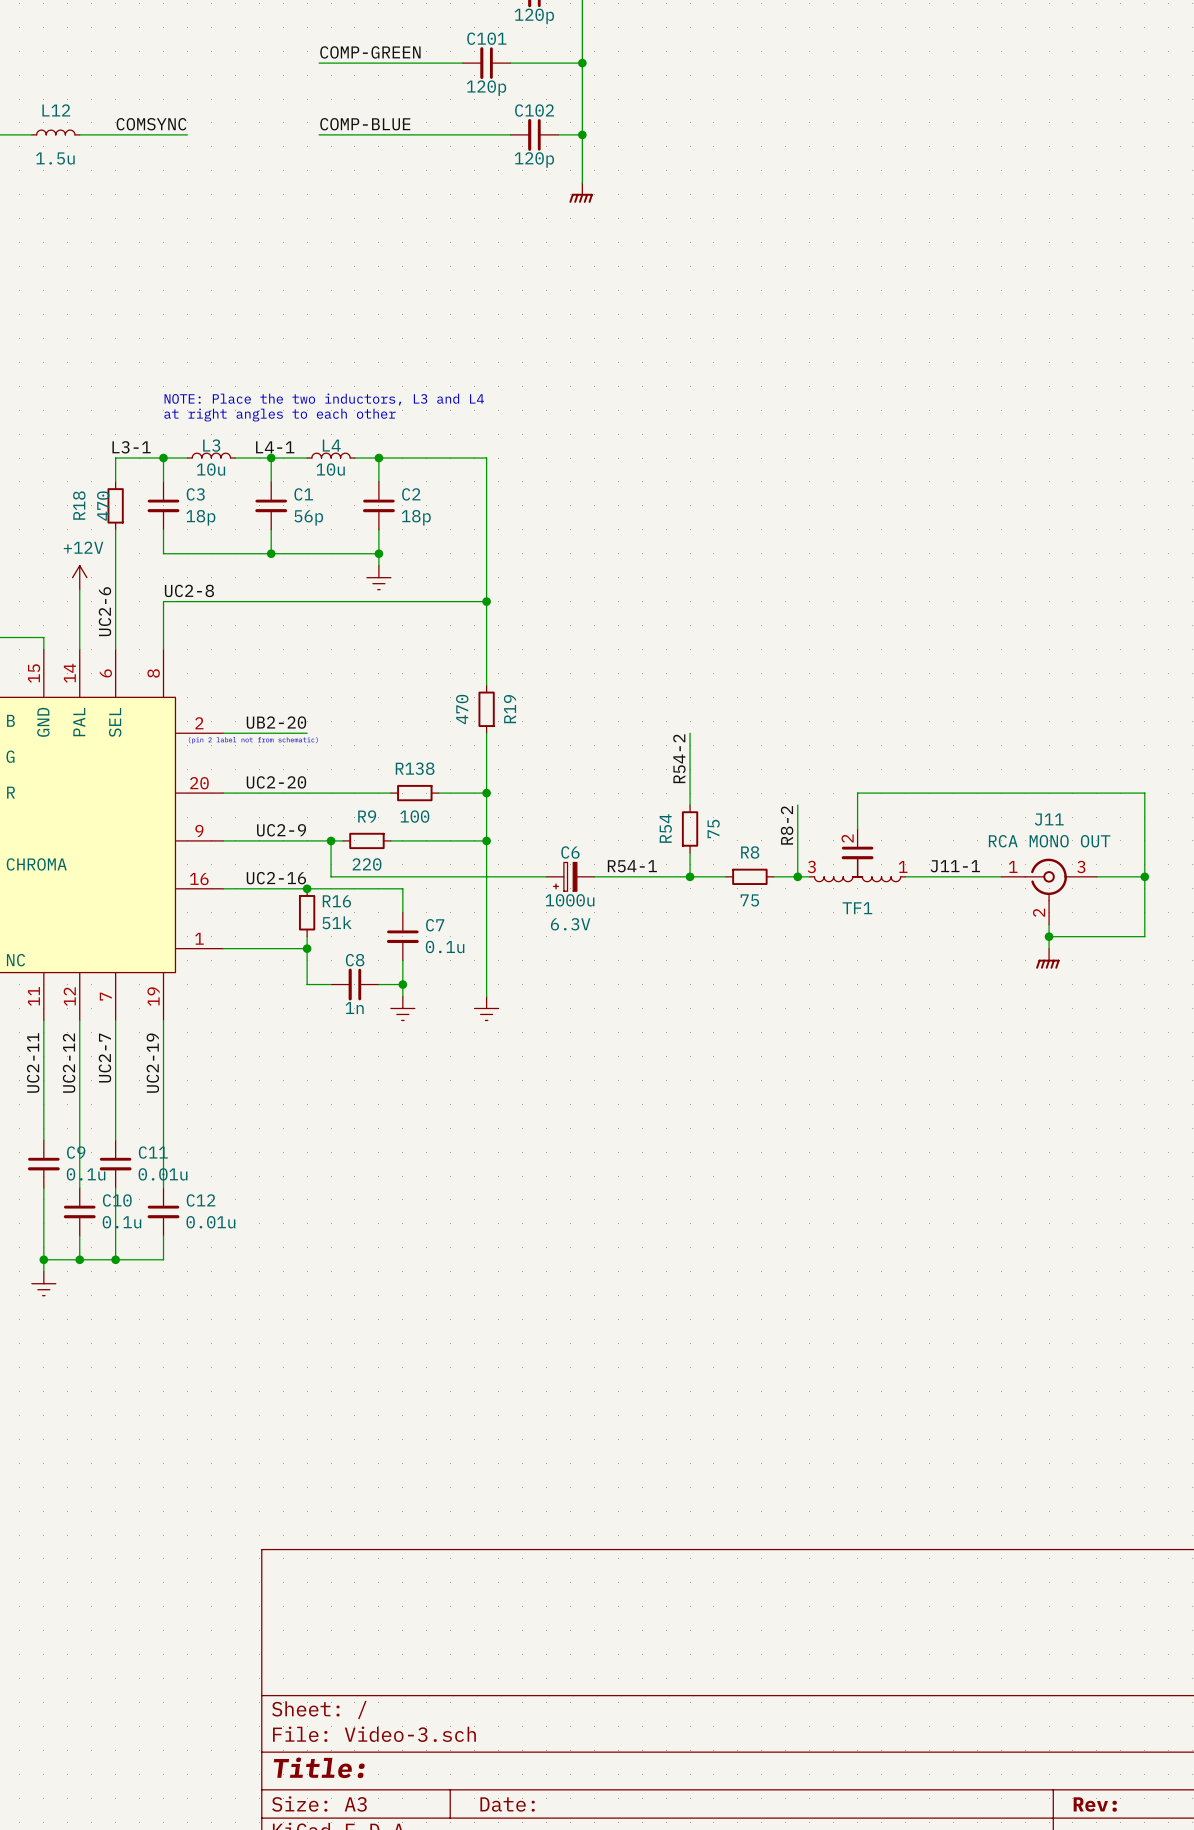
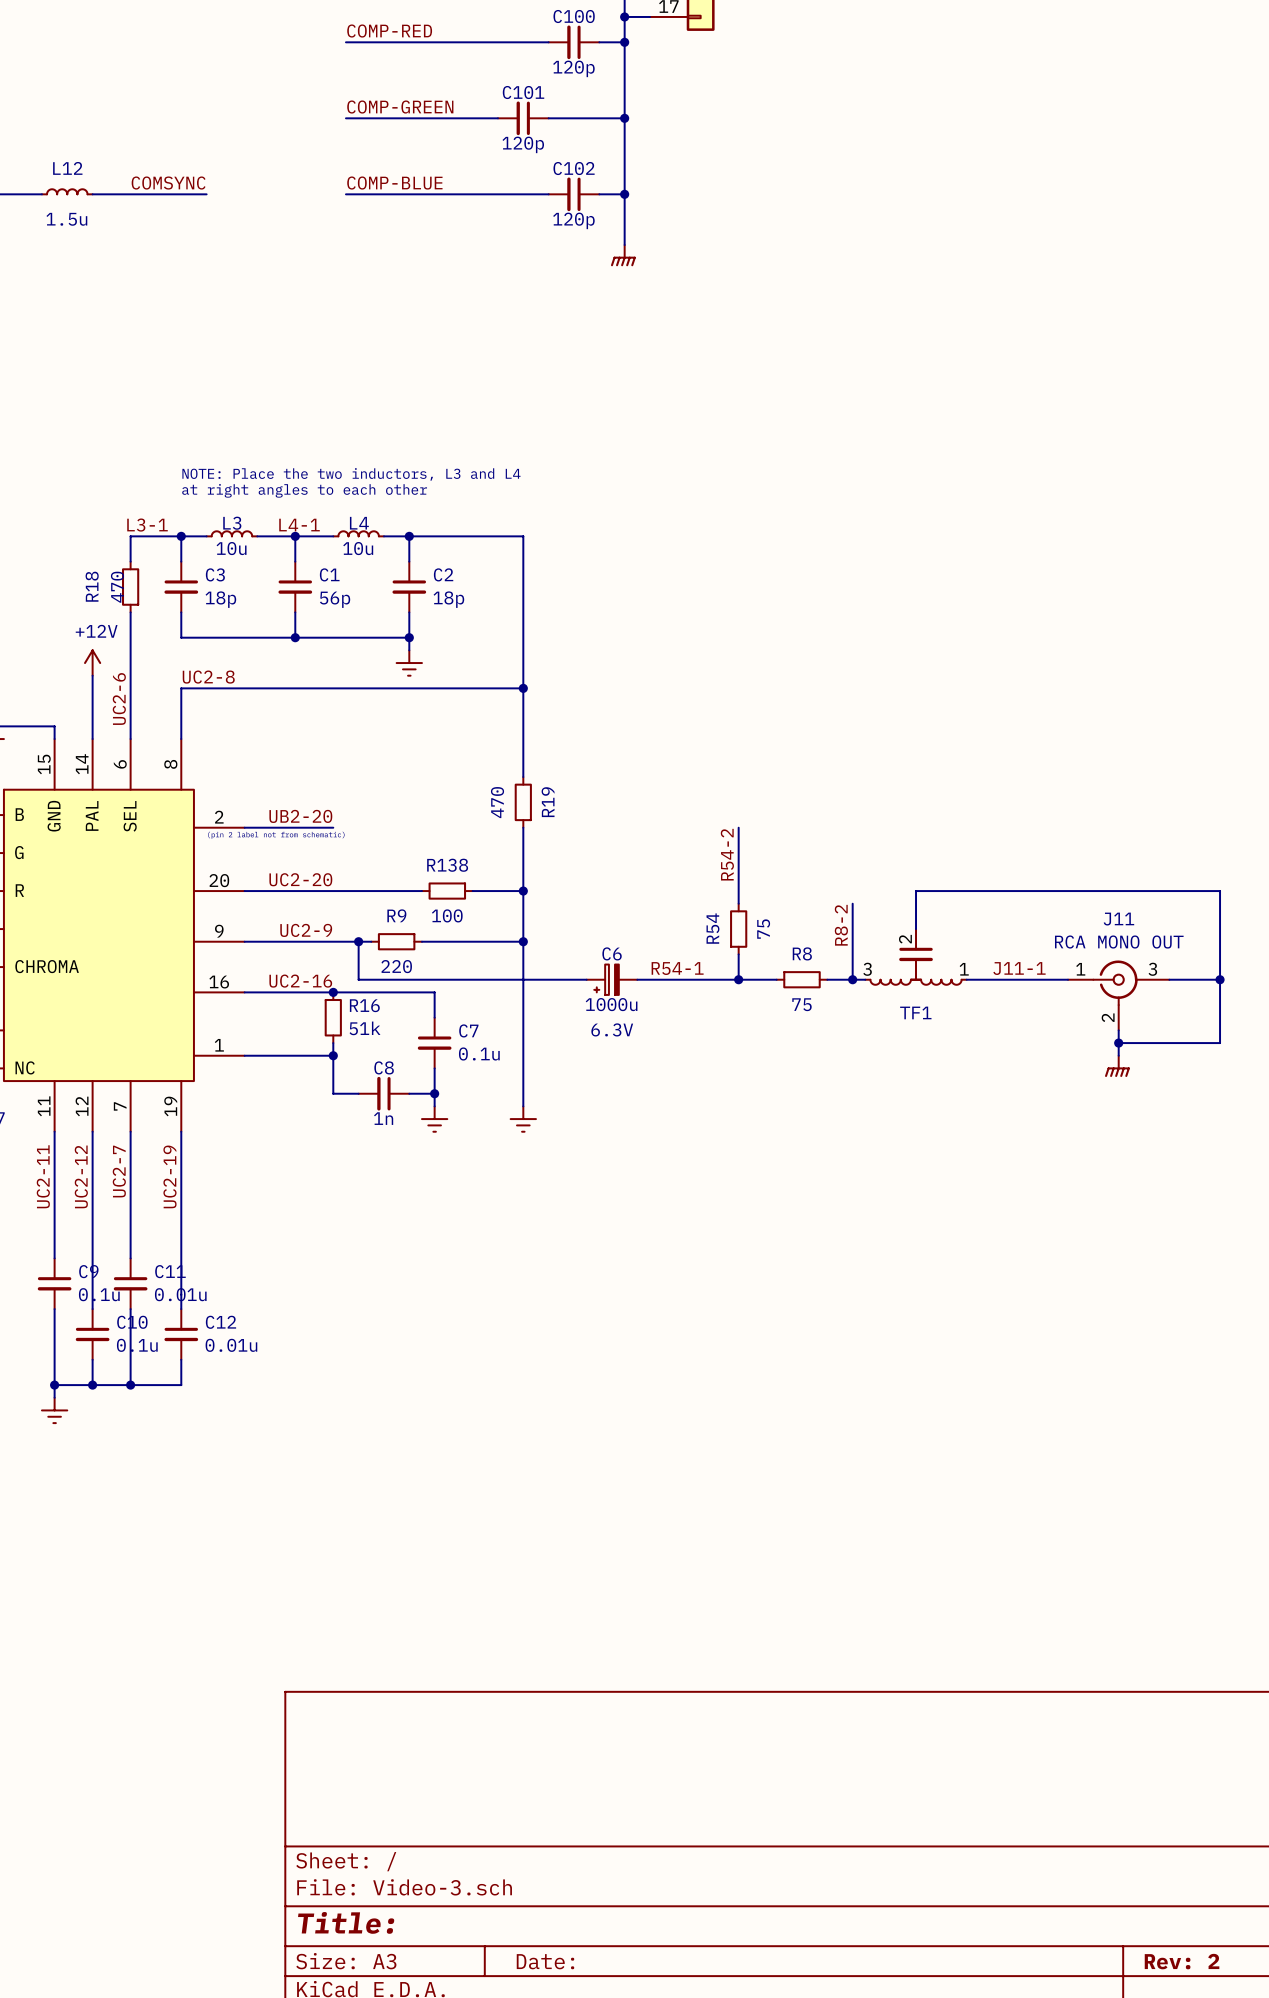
title block: Rev: (1095, 1804) -> Rev: 2 (1182, 1961)

